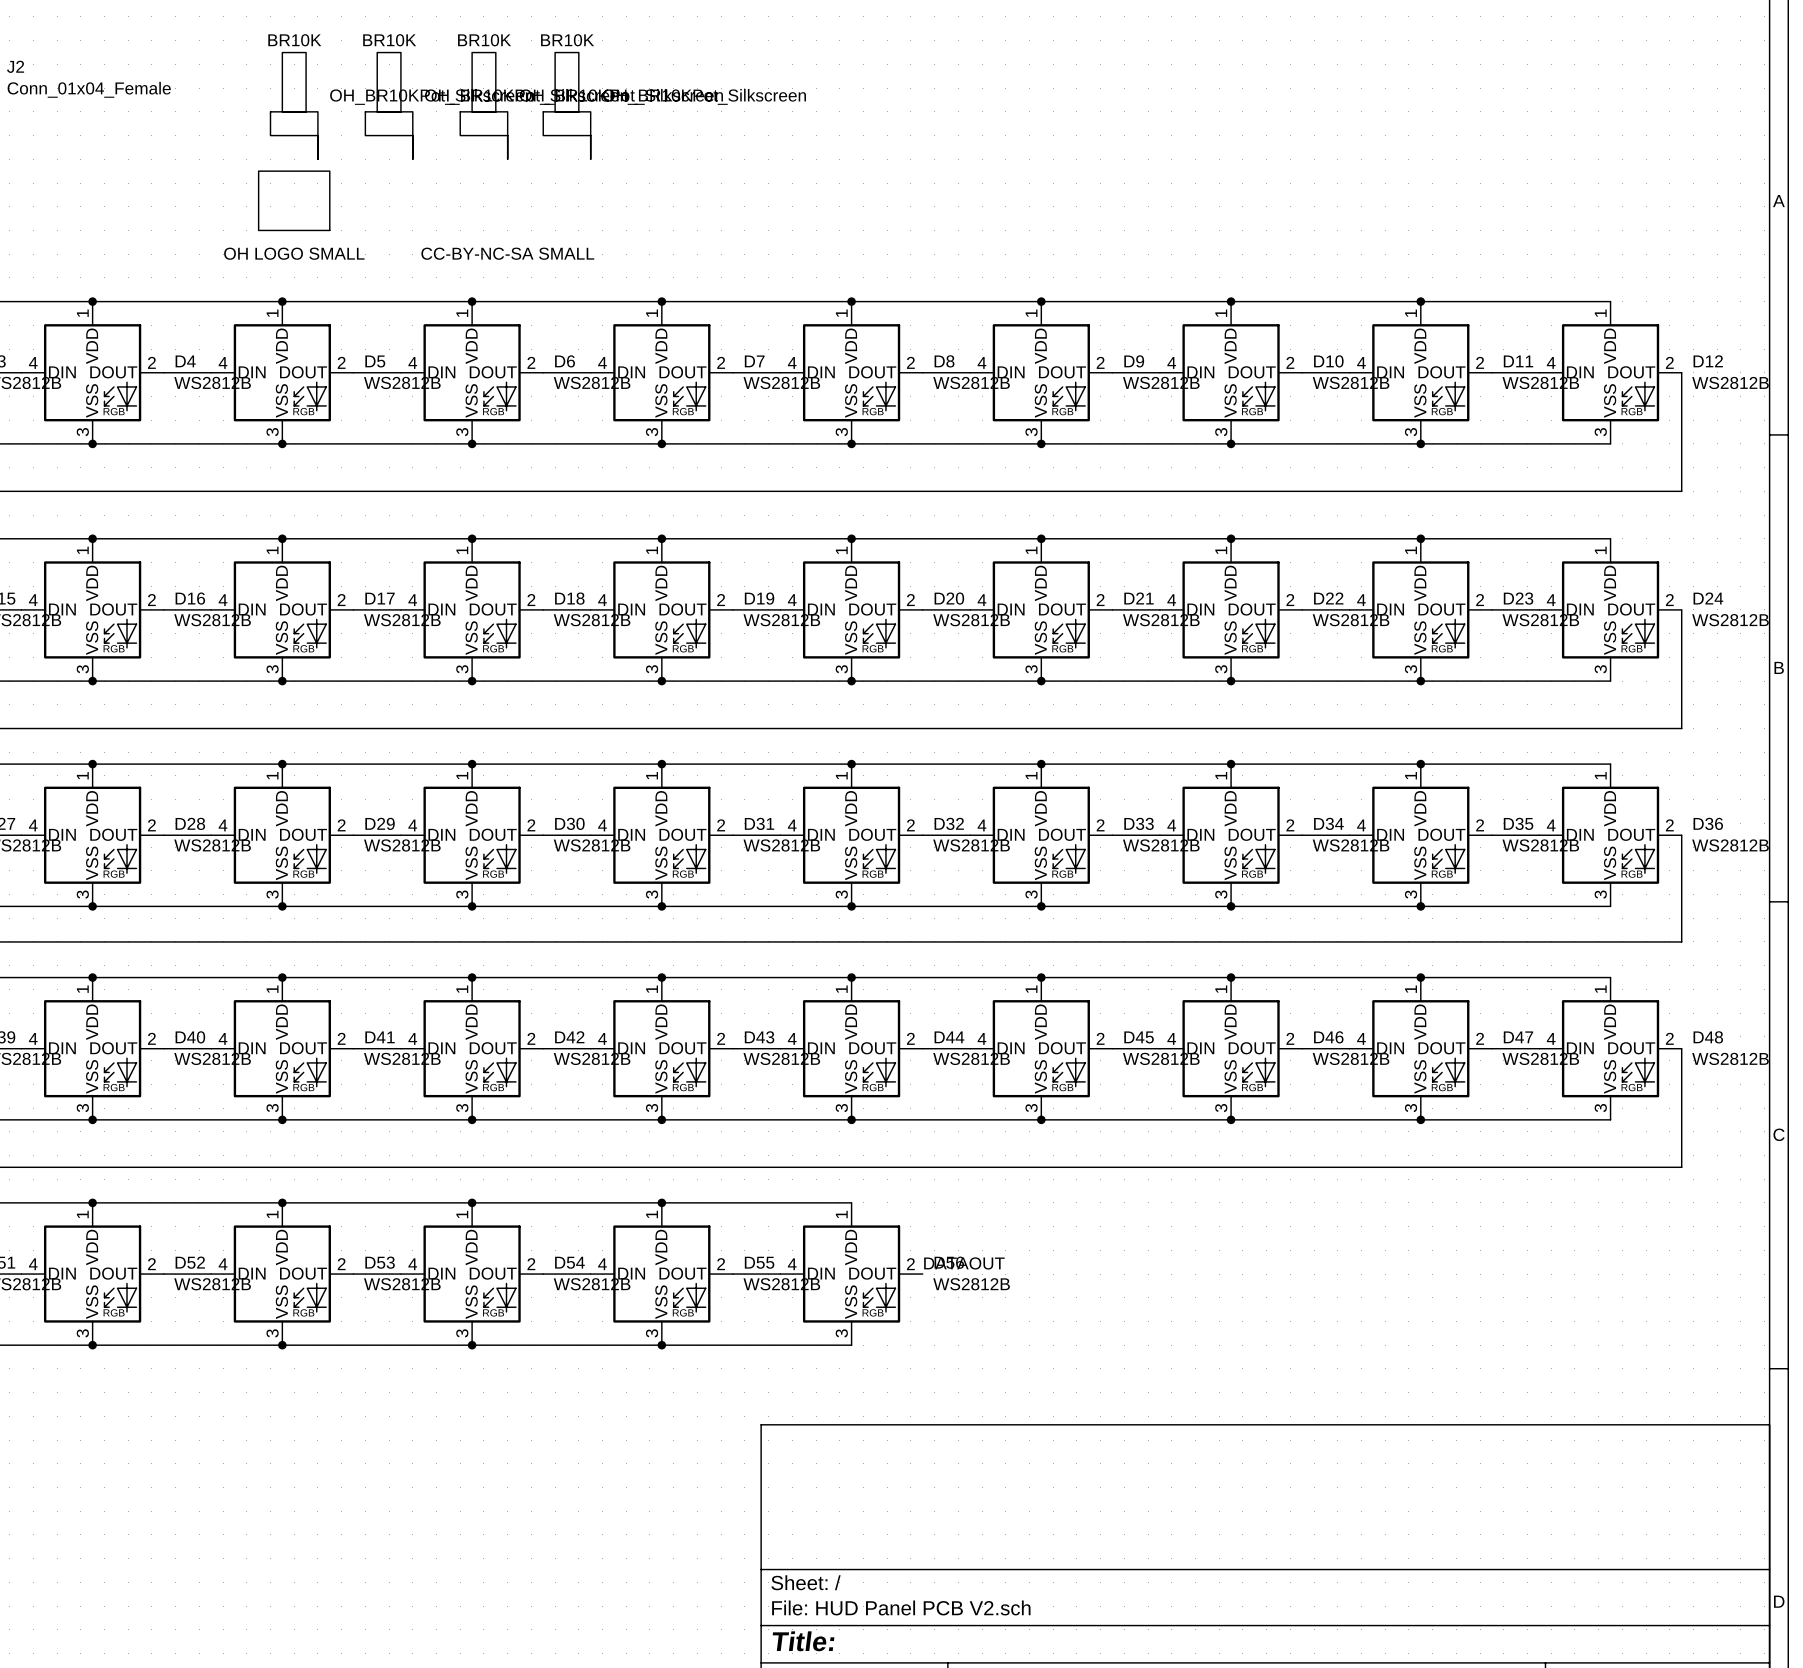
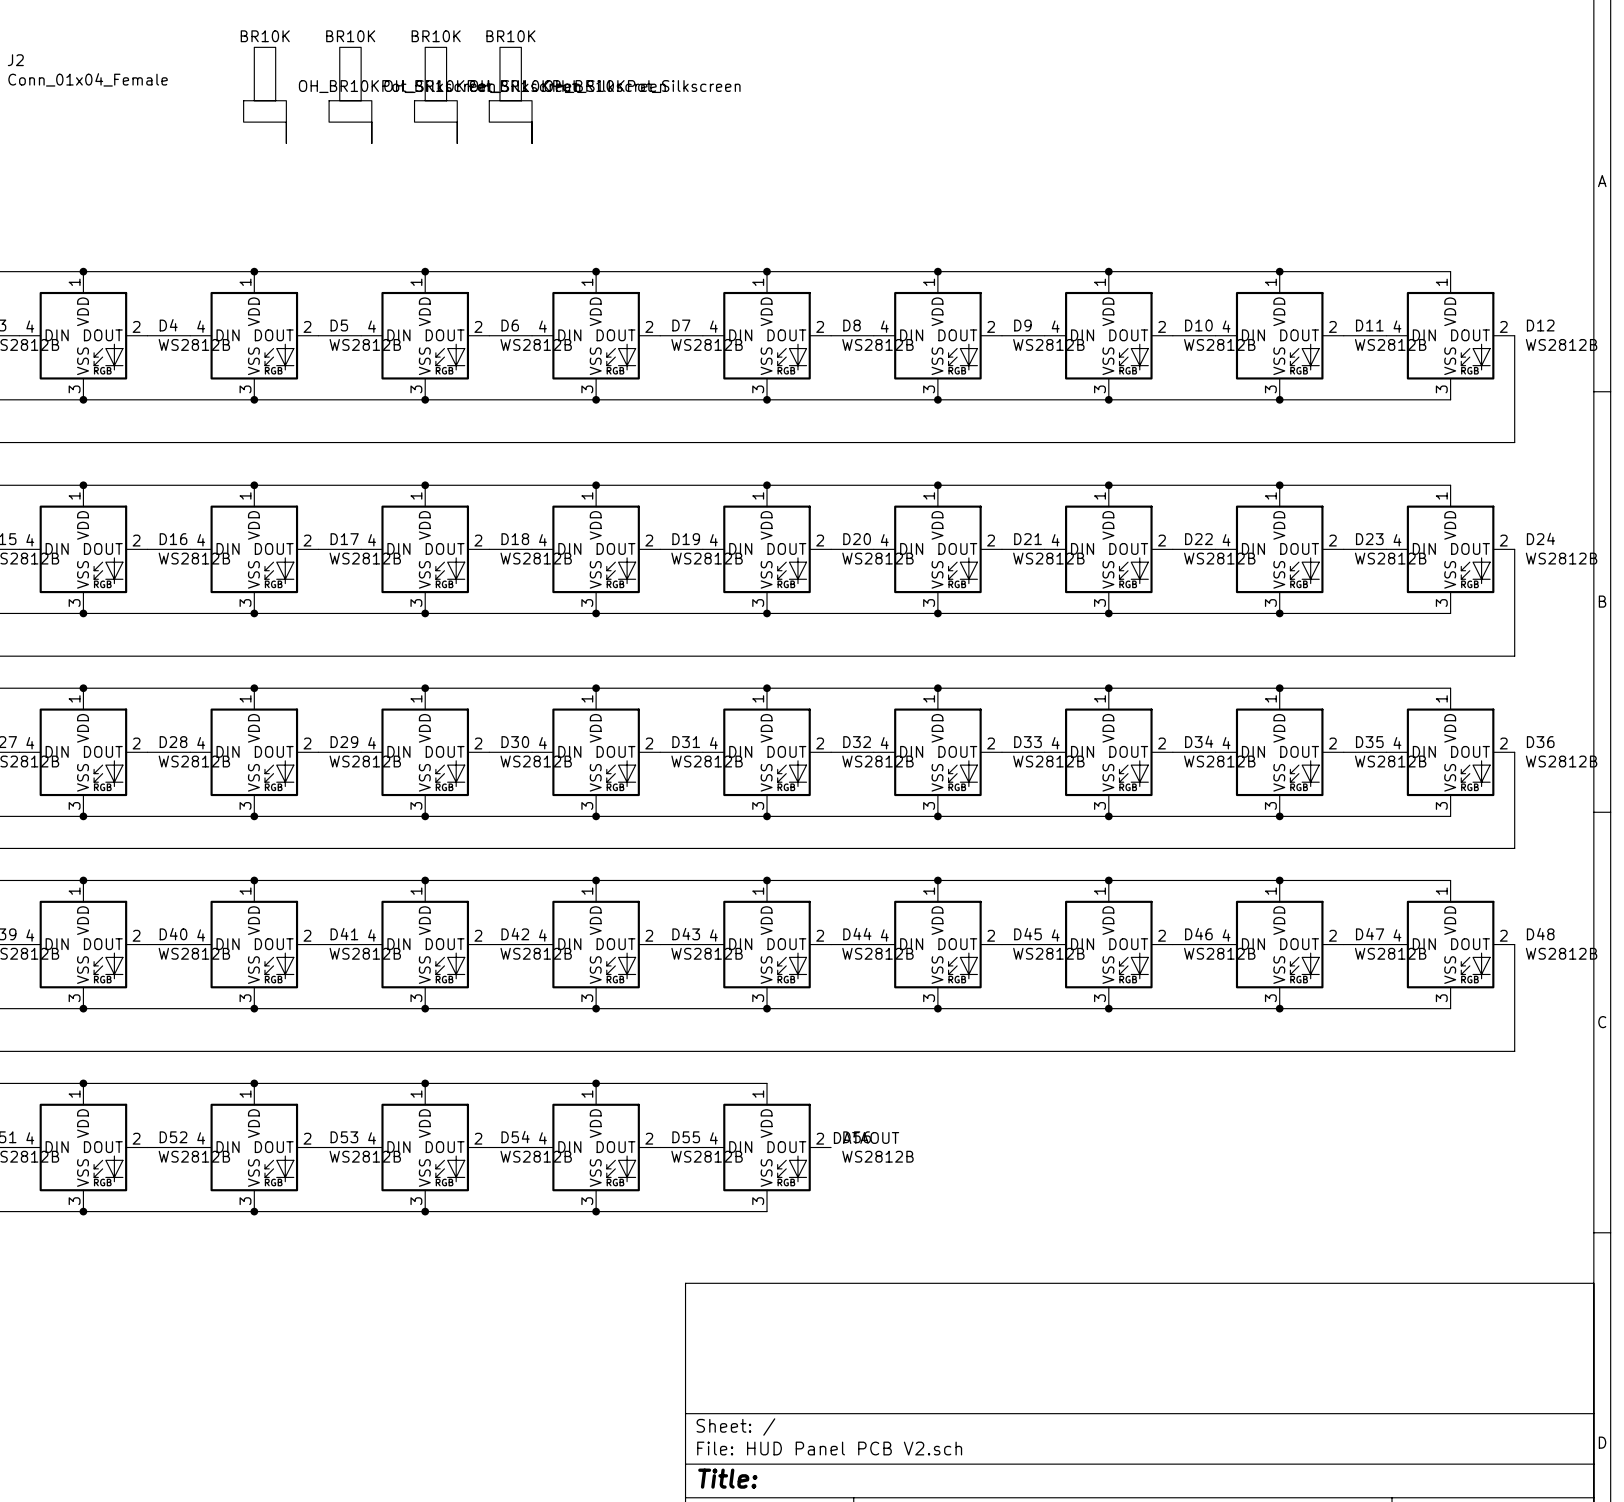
part: (294, 200) -> none
part: (507, 253) -> none

